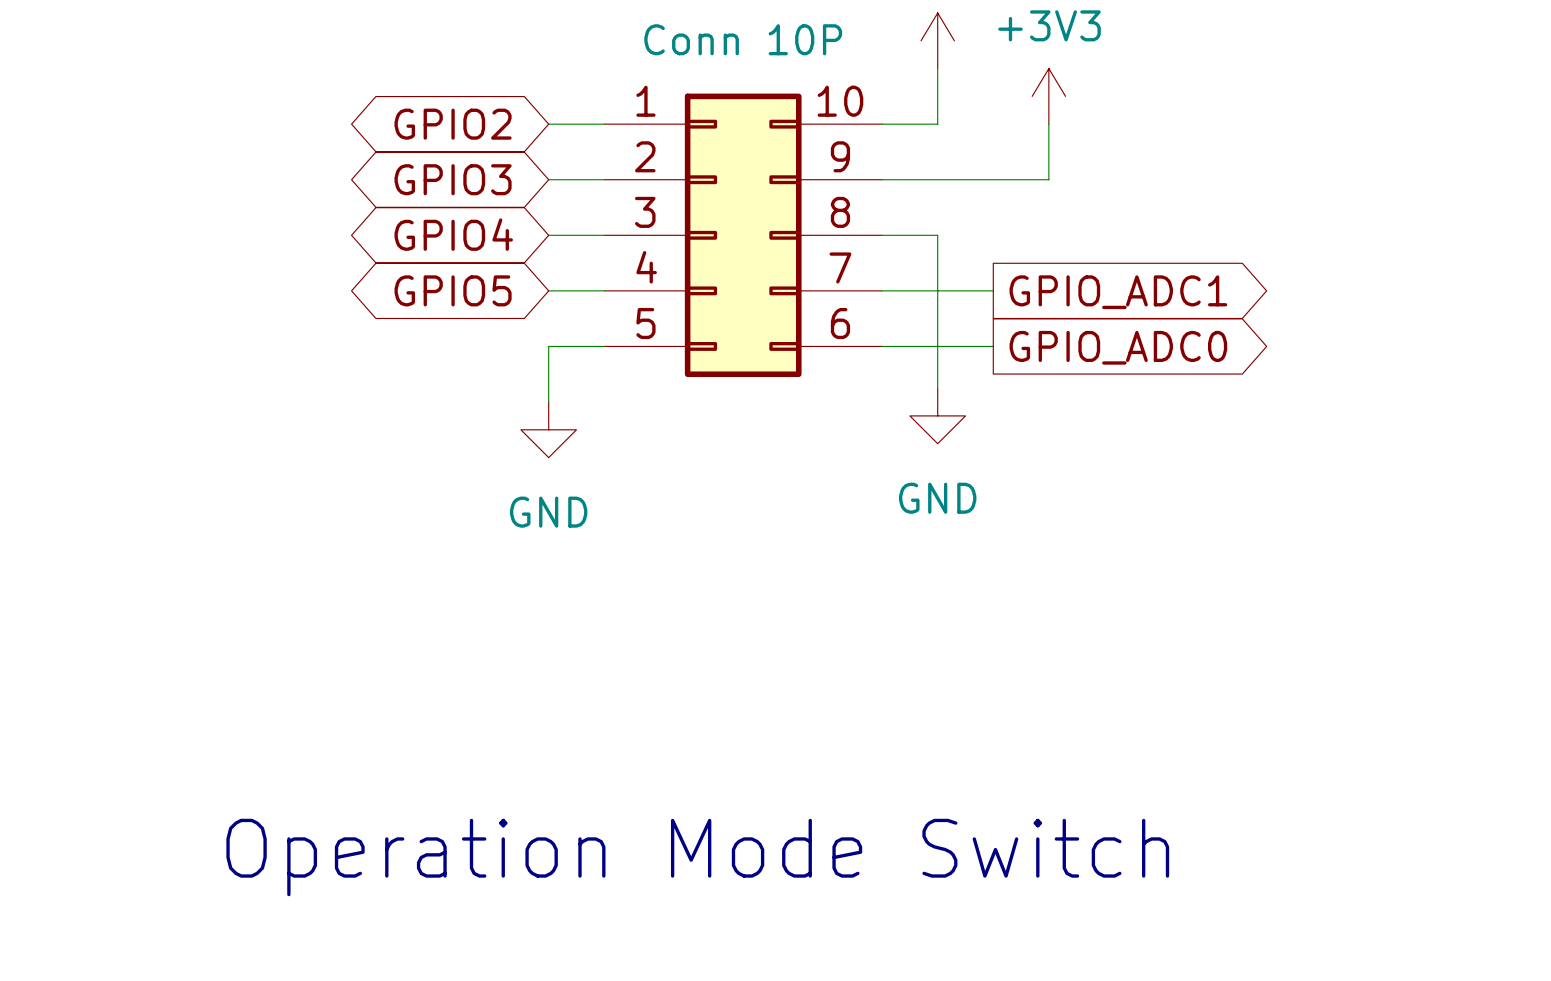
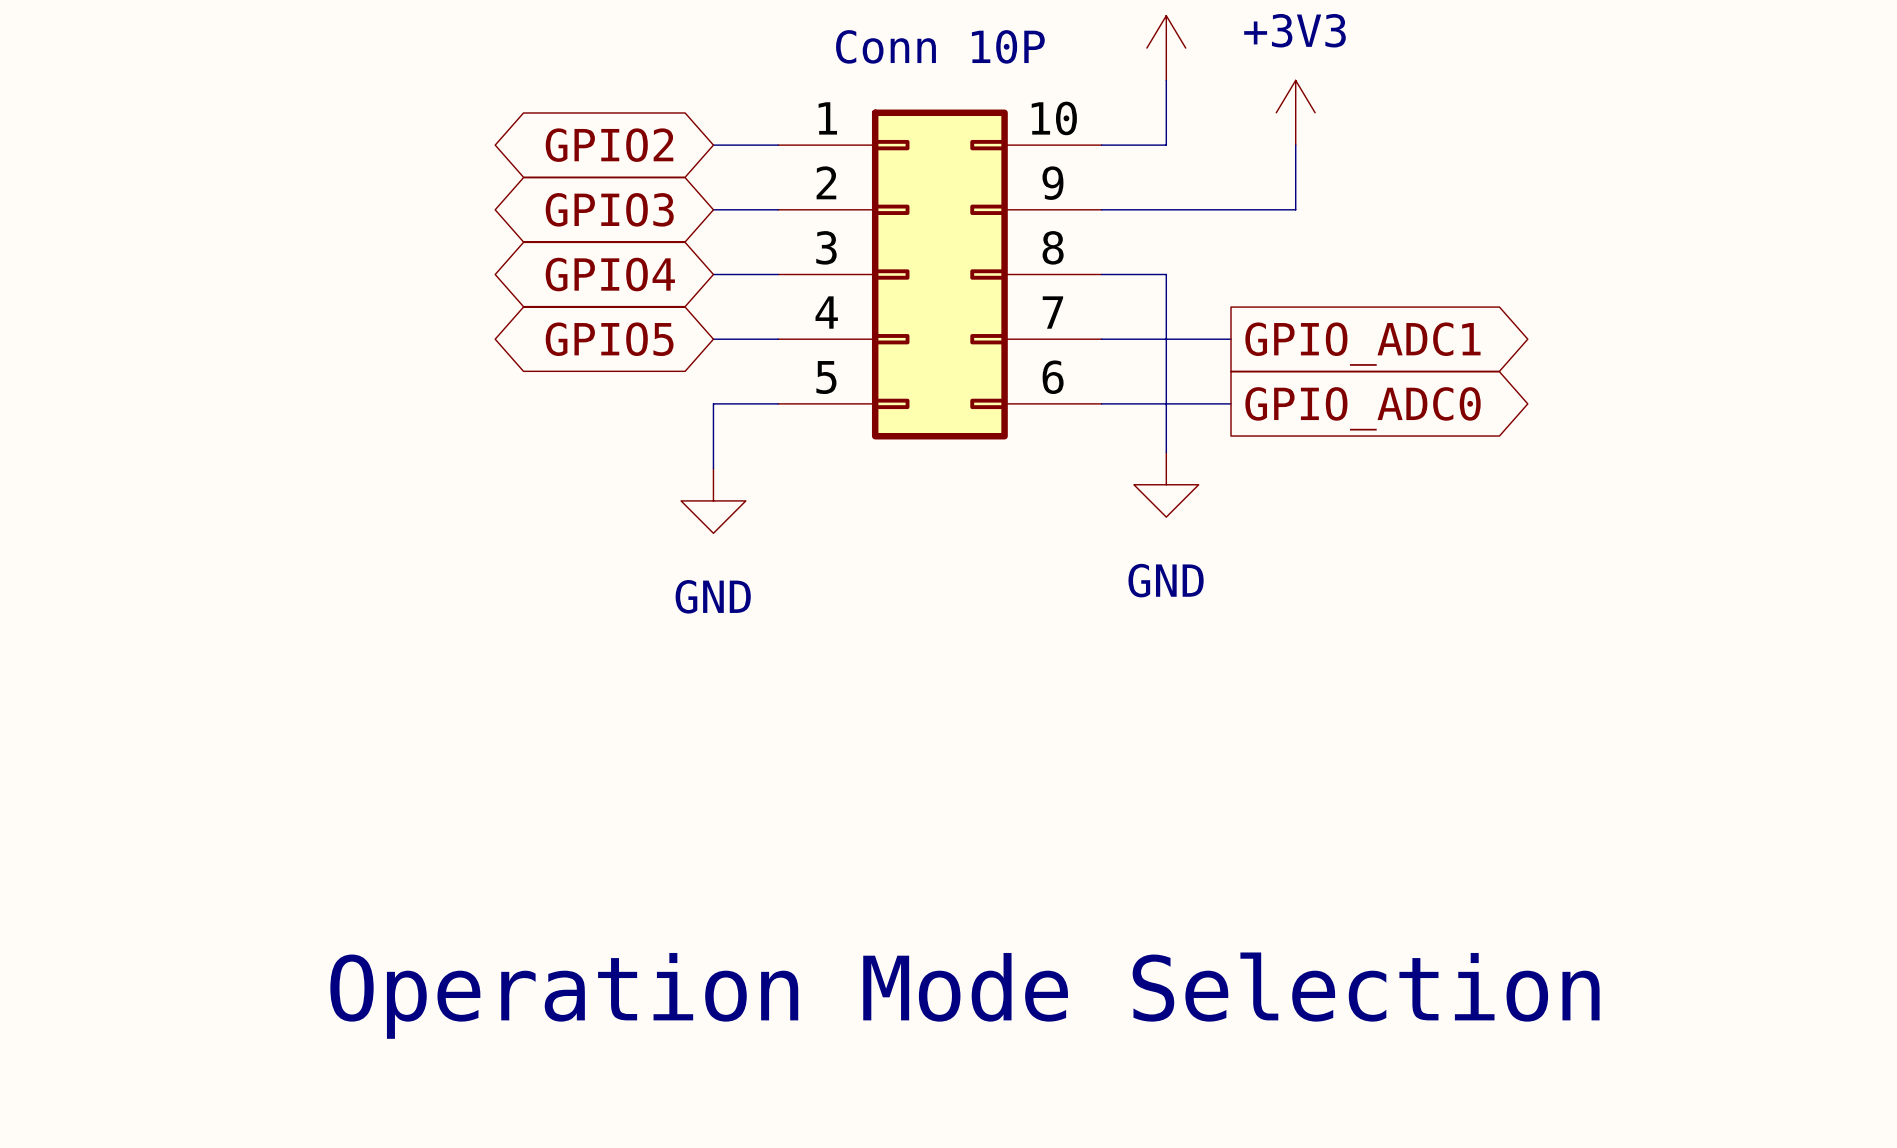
text: Operation Mode Switch (697, 857) -> Operation Mode Selection (964, 995)

